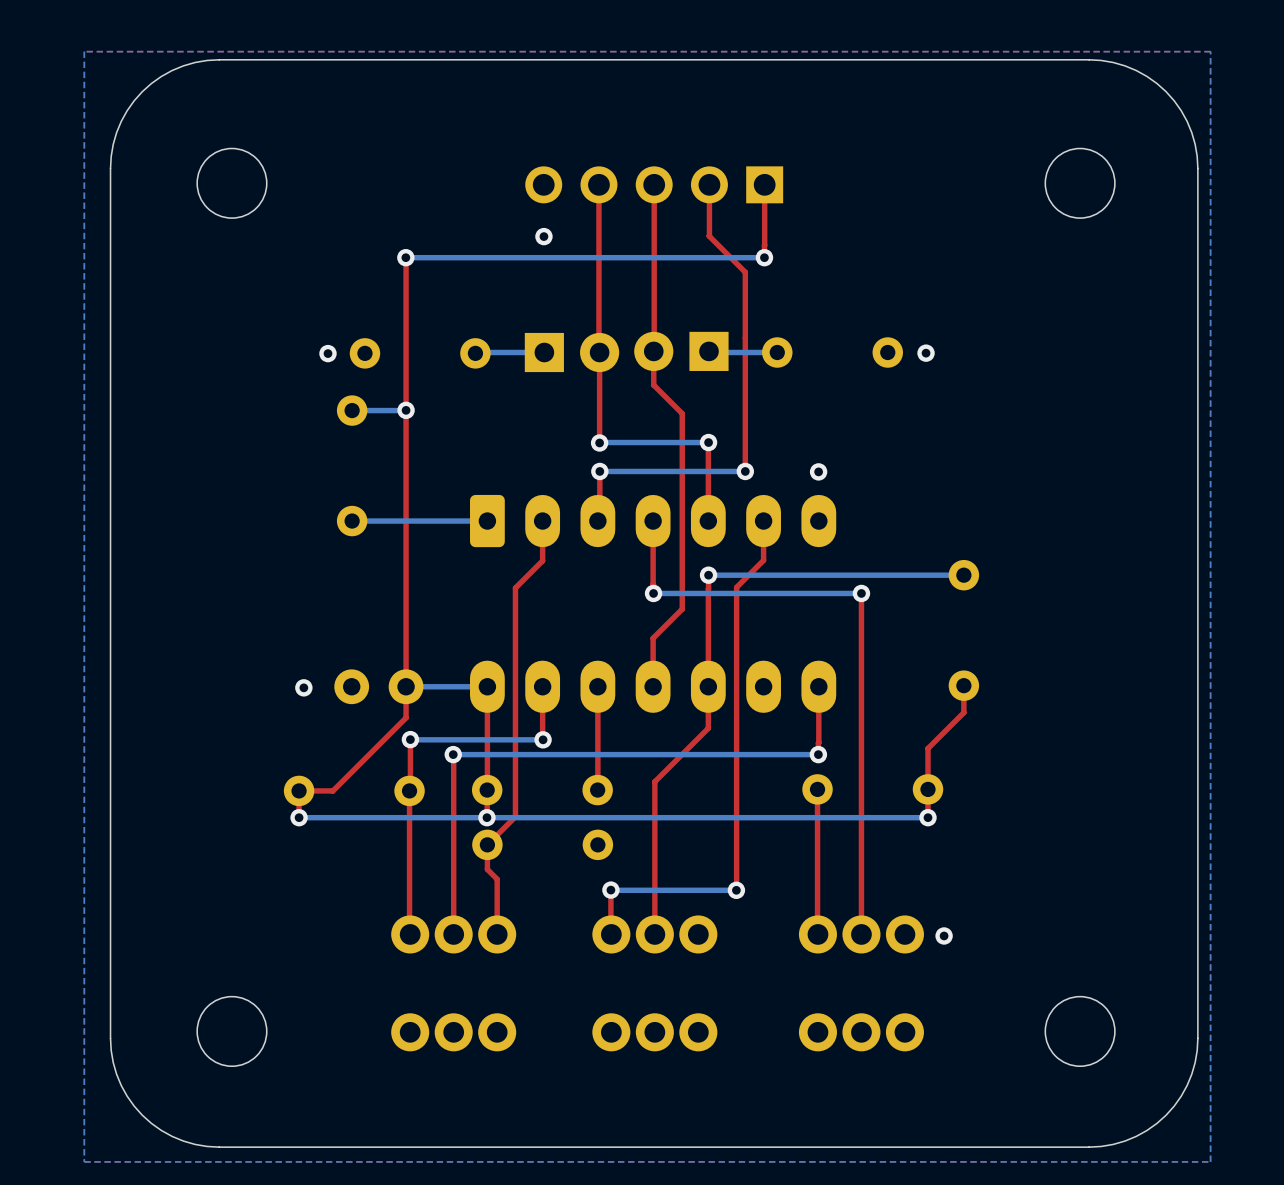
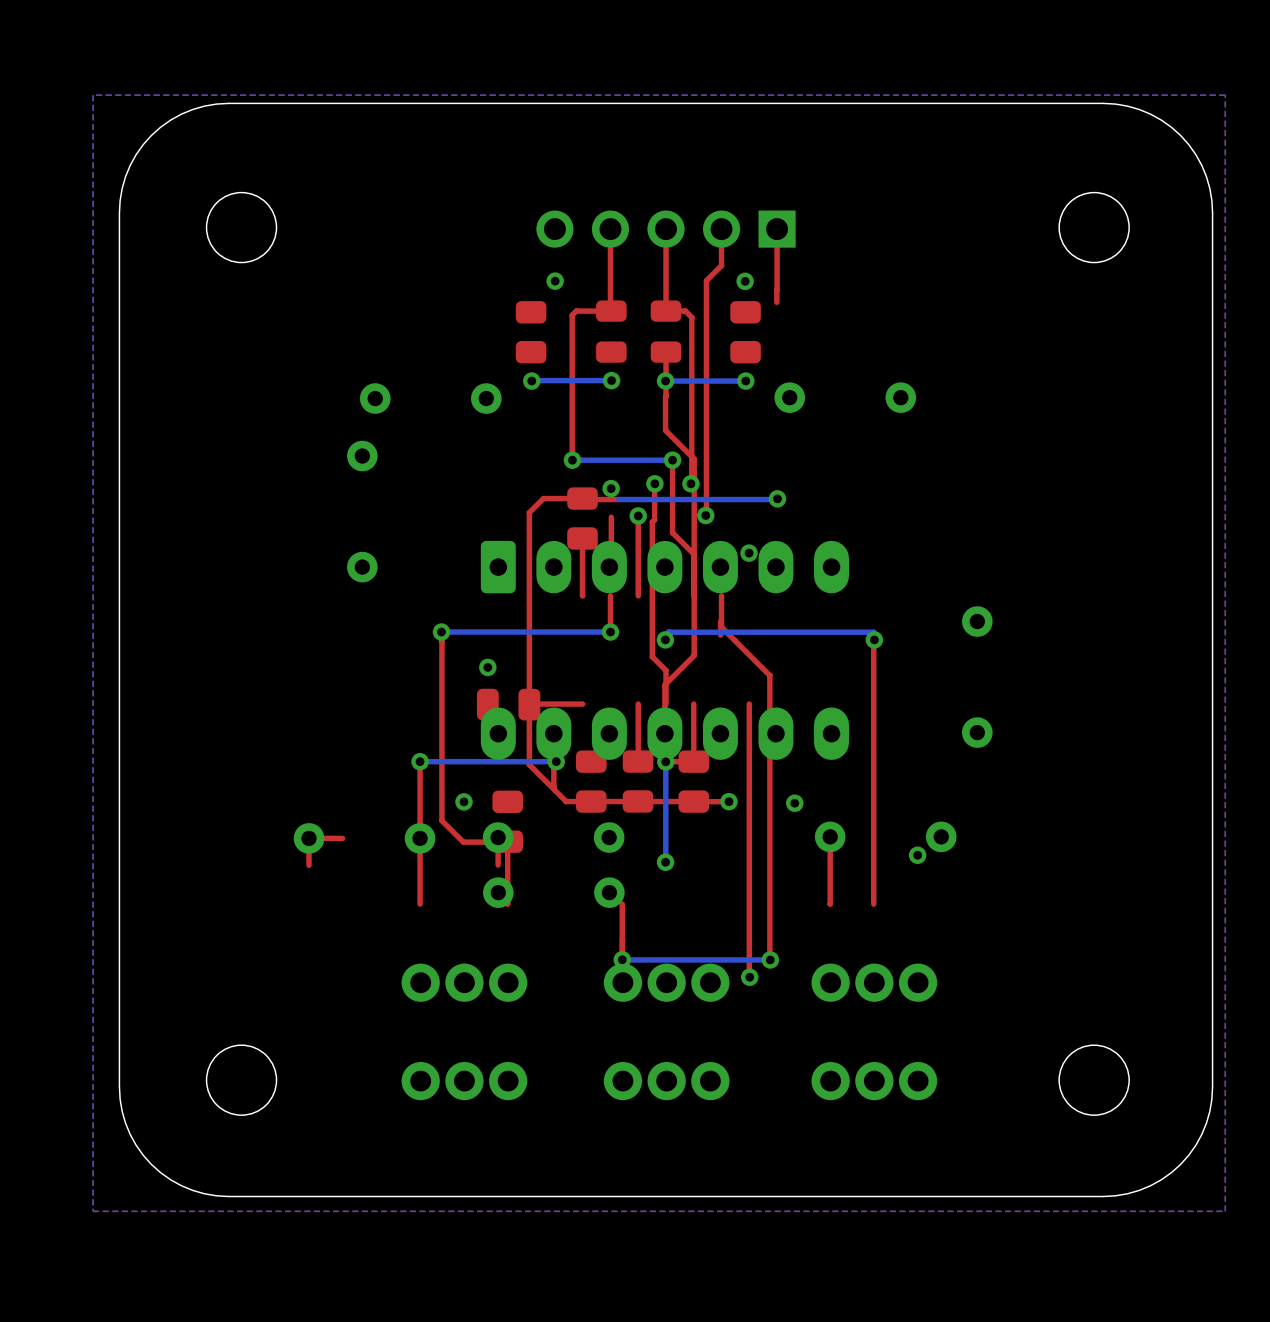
top track: (709, 221) (709, 235) -> (721, 265) (706, 280) (705, 515)
top track: (709, 236) (745, 272) (745, 471) -> none
via: (405, 257) -> none
top track: (406, 257) (406, 717) (332, 791) -> none
bottom track: (764, 257) (405, 257) -> none
via position: (764, 257) -> (745, 281)
top track: (598, 265) (599, 442) -> (610, 310) (576, 311) (572, 315) (572, 459)
top track: (654, 266) (654, 307) -> (666, 311) (685, 311) (691, 317) (690, 483)
part: none -> (611, 331)
part: none -> (666, 331)
part: none -> (531, 332)
part: none -> (745, 332)
via: none -> (531, 381)
bottom track: none -> (611, 380) (531, 381)
via: none -> (611, 380)
via: none -> (665, 381)
bottom track: none -> (745, 381) (665, 381)
via: none -> (745, 381)
part: (681, 351) -> none
bottom track: (709, 351) (777, 352) -> none
bottom track: (544, 352) (475, 353) -> none
part: (572, 352) -> none
via: (327, 353) -> none
via: (926, 353) -> none
bottom track: (405, 410) (352, 410) -> none
via: (406, 410) -> none
via: none -> (572, 460)
top track: none -> (672, 460) (672, 532) (693, 553) (693, 595)
bottom track: none -> (672, 460) (572, 460)
via: none -> (672, 460)
via: none -> (654, 483)
via: none -> (690, 483)
top track: none -> (654, 488) (654, 519) (652, 522) (652, 656) (666, 670) (666, 704)
top track: (708, 442) (708, 521) -> none
bottom track: (708, 442) (599, 442) -> none
via: (708, 442) -> none
top track: none -> (618, 499) (543, 498) (529, 512) (529, 764) (566, 801) (728, 801)
bottom track: none -> (777, 498) (618, 499)
via: none -> (777, 498)
via: none -> (705, 515)
top track: none -> (638, 515) (638, 595)
via position: (599, 471) -> (638, 515)
bottom track: (745, 471) (599, 471) -> none
via: (745, 471) -> none
via: (818, 471) -> none
part: none -> (582, 518)
top track: none -> (582, 538) (582, 595)
via: none -> (749, 553)
bottom track: (487, 521) (352, 521) -> (556, 761) (420, 761)
top track: (542, 521) (542, 560) (515, 588) (515, 816) (487, 844) (487, 869) (497, 879) (497, 934) -> none
top track: (653, 521) (653, 593) -> none
top track: (763, 521) (763, 560) (736, 587) (736, 890) -> none
top track: none -> (610, 595) (610, 632)
top track: none -> (721, 595) (721, 627) (769, 675) (770, 959)
via: (708, 575) -> none
bottom track: (963, 575) (708, 575) -> none
top track: none -> (441, 632) (441, 820) (463, 842) (507, 841) (507, 903)
via: none -> (441, 632)
bottom track: none -> (610, 632) (441, 632)
via: none -> (610, 632)
bottom track: none -> (668, 631) (873, 632)
top track: none -> (873, 632) (873, 904)
top track: (708, 588) (708, 728) (654, 781) (654, 934) -> none
top track: (861, 593) (861, 934) -> none
bottom track: (861, 593) (653, 593) -> none
via: none -> (487, 667)
part: none -> (508, 704)
top track: none -> (582, 704) (529, 704)
top track: none -> (638, 704) (638, 761)
top track: none -> (693, 704) (693, 761) (666, 761)
top track: none -> (749, 704) (749, 977)
top track: (963, 685) (963, 712) (928, 748) (928, 817) -> none
part: (378, 686) -> none
top track: (487, 686) (487, 789) -> none
bottom track: (487, 686) (406, 686) -> none
top track: (597, 686) (597, 789) -> none
top track: (818, 686) (818, 754) -> none
via: (303, 687) -> none
bottom track: none -> (665, 761) (665, 862)
via: none -> (665, 761)
part: none -> (591, 781)
part: none -> (638, 781)
part: none -> (693, 781)
top track: (410, 739) (409, 790) -> (420, 761) (420, 838)
via position: (410, 739) -> (420, 761)
bottom track: (543, 739) (410, 739) -> none
via position: (543, 739) -> (556, 761)
top track: (453, 754) (453, 934) -> none
via: none -> (728, 801)
bottom track: (818, 754) (453, 754) -> none
via position: (818, 754) -> (794, 803)
part: none -> (507, 821)
via: none -> (665, 862)
via: (299, 817) -> none
via: (486, 817) -> none
bottom track: (928, 817) (299, 817) -> none
via position: (928, 817) -> (917, 855)
top track: (409, 856) (410, 934) -> none
top track: none -> (622, 904) (622, 959)
top track: (817, 856) (817, 934) -> none
via position: (610, 890) -> (622, 959)
bottom track: (736, 890) (611, 890) -> none
via: (736, 890) -> none
bottom track: none -> (770, 959) (622, 959)
via: none -> (770, 959)
via: none -> (749, 977)
via: (944, 935) -> none

